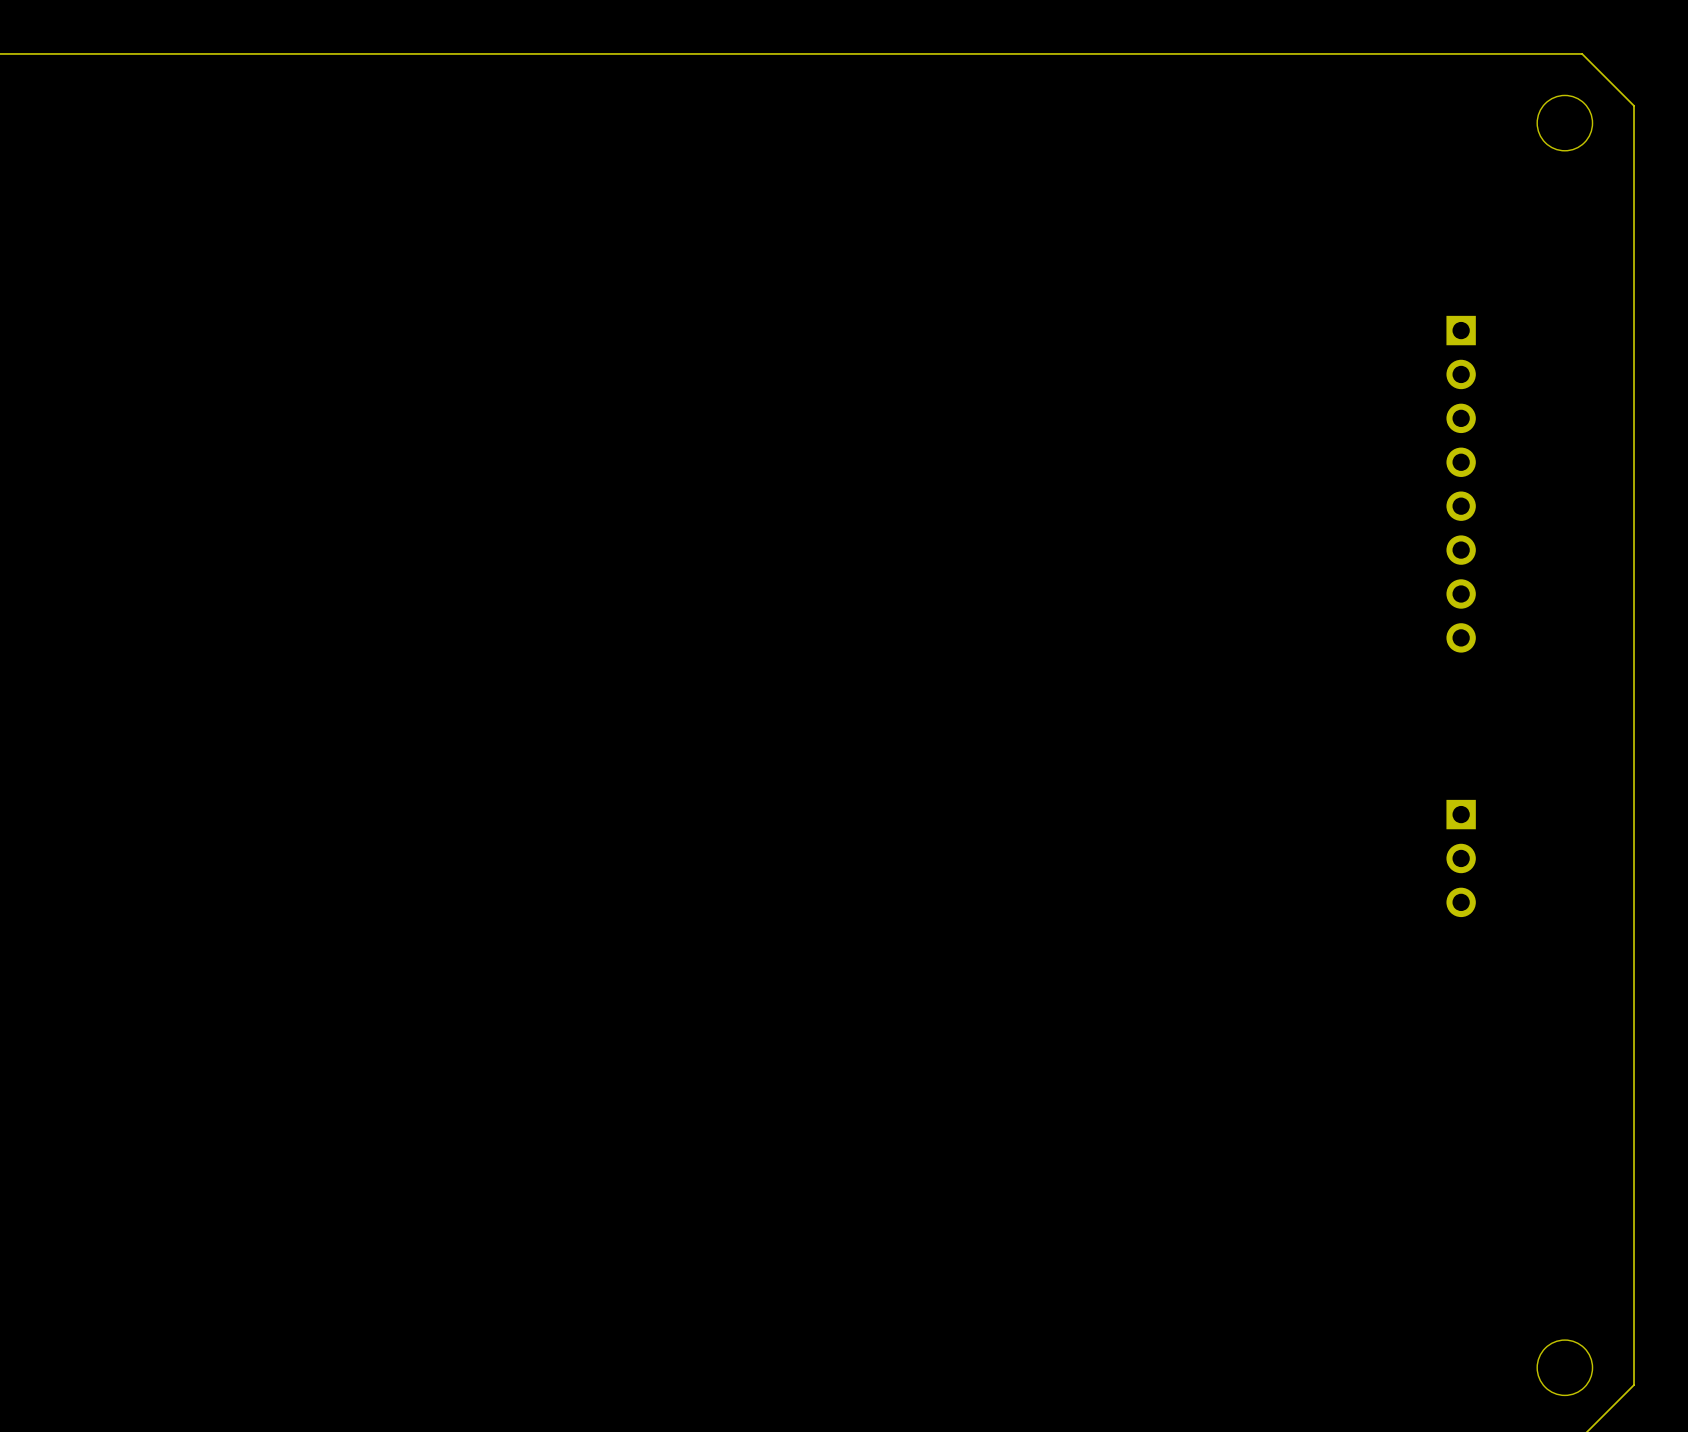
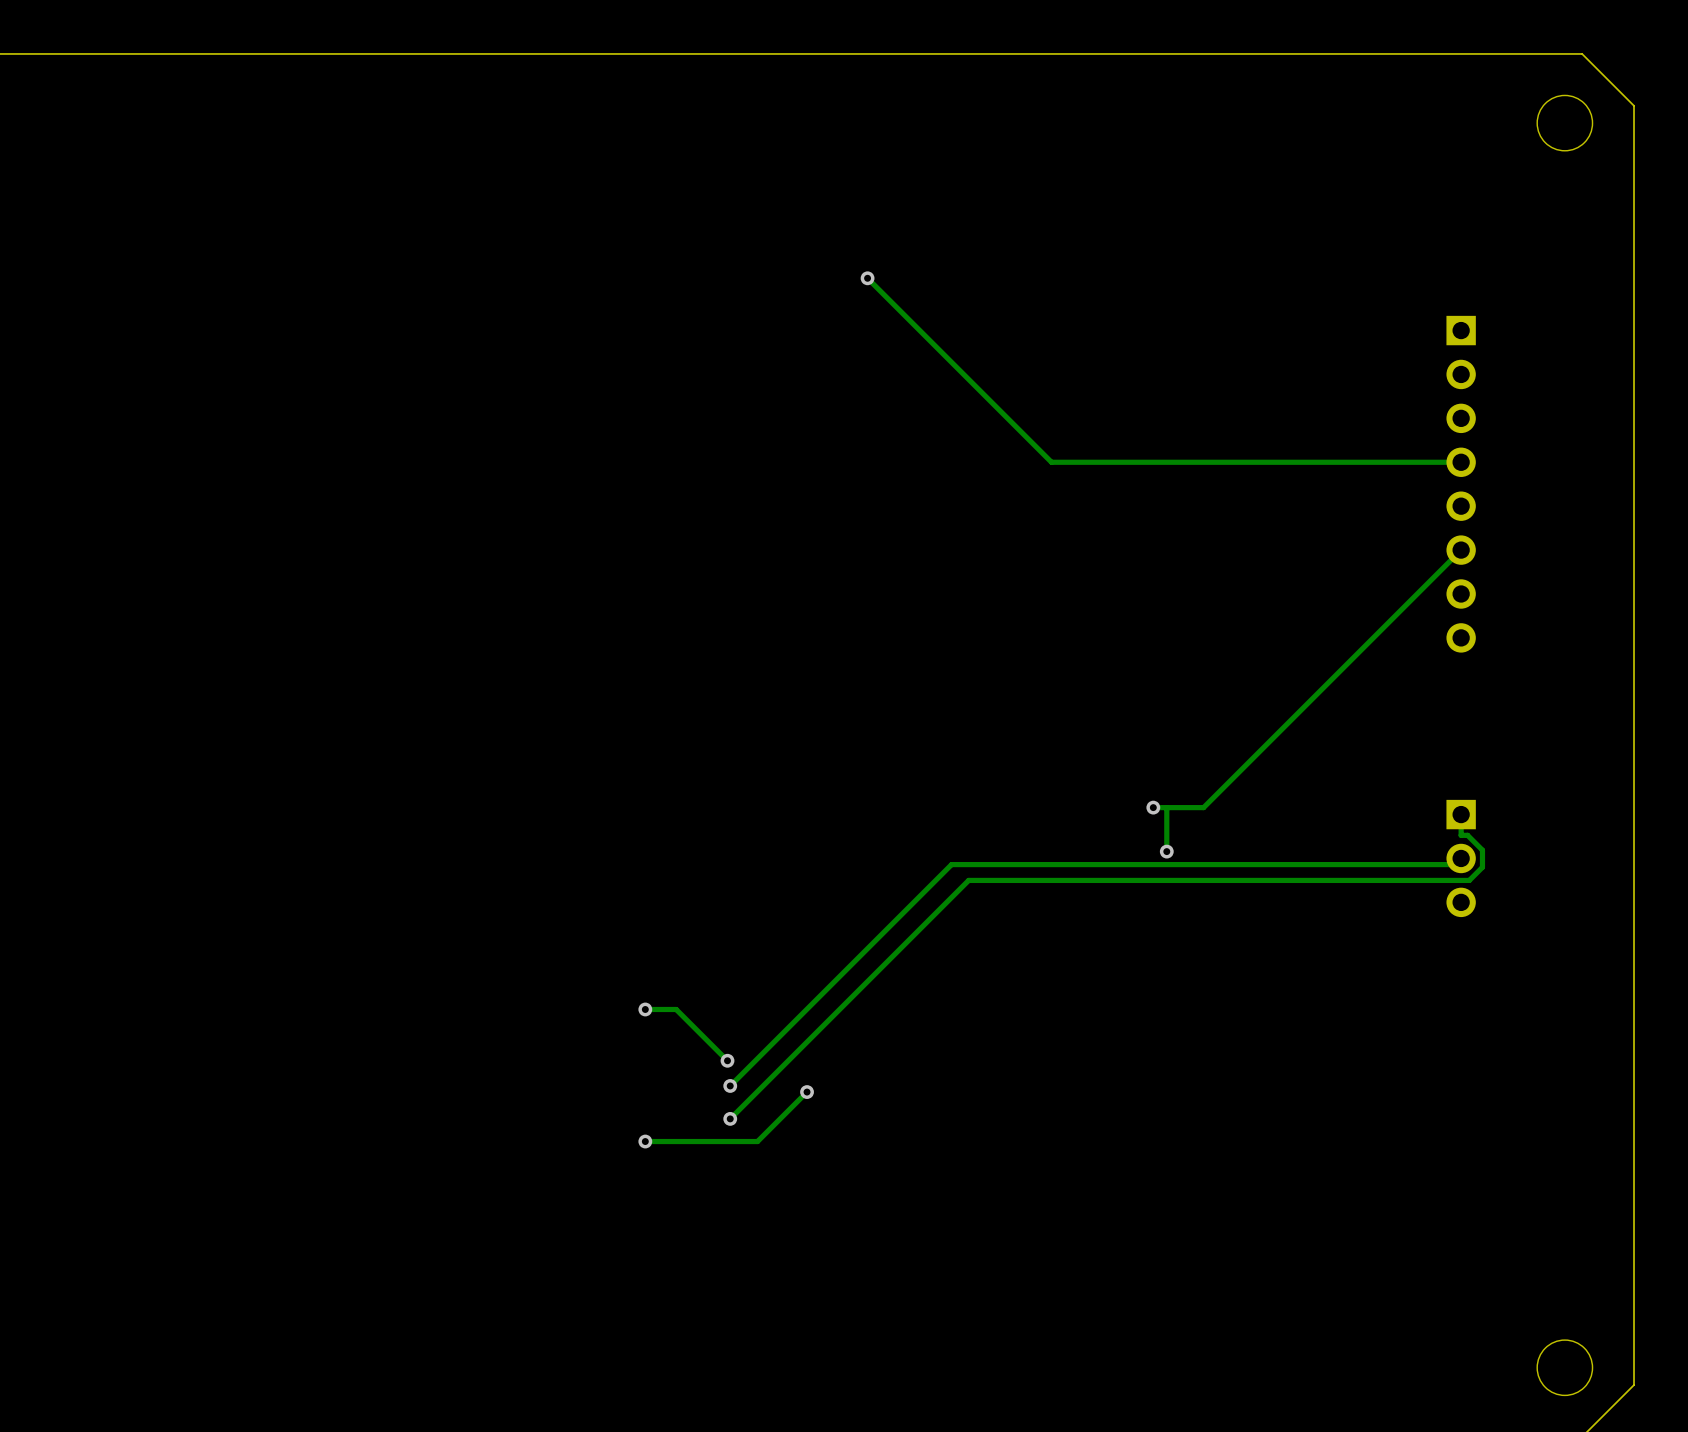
track: none -> (867, 278) (1051, 462) (1461, 462)
via: none -> (867, 278)
track: none -> (1461, 550) (1203, 807) (1153, 807)
via: none -> (1153, 807)
track: none -> (1166, 807) (1166, 851)
track: none -> (1461, 814) (1461, 835) (1467, 835) (1482, 850) (1482, 867) (1469, 880) (968, 880) (730, 1118)
via: none -> (1166, 851)
track: none -> (1461, 858) (1455, 864) (951, 864) (730, 1085)
track: none -> (645, 1009) (676, 1009) (727, 1060)
via: none -> (645, 1009)
via: none -> (727, 1060)
via: none -> (730, 1085)
track: none -> (807, 1092) (757, 1141) (645, 1141)
via: none -> (807, 1092)
via: none -> (730, 1118)
via: none -> (645, 1141)

